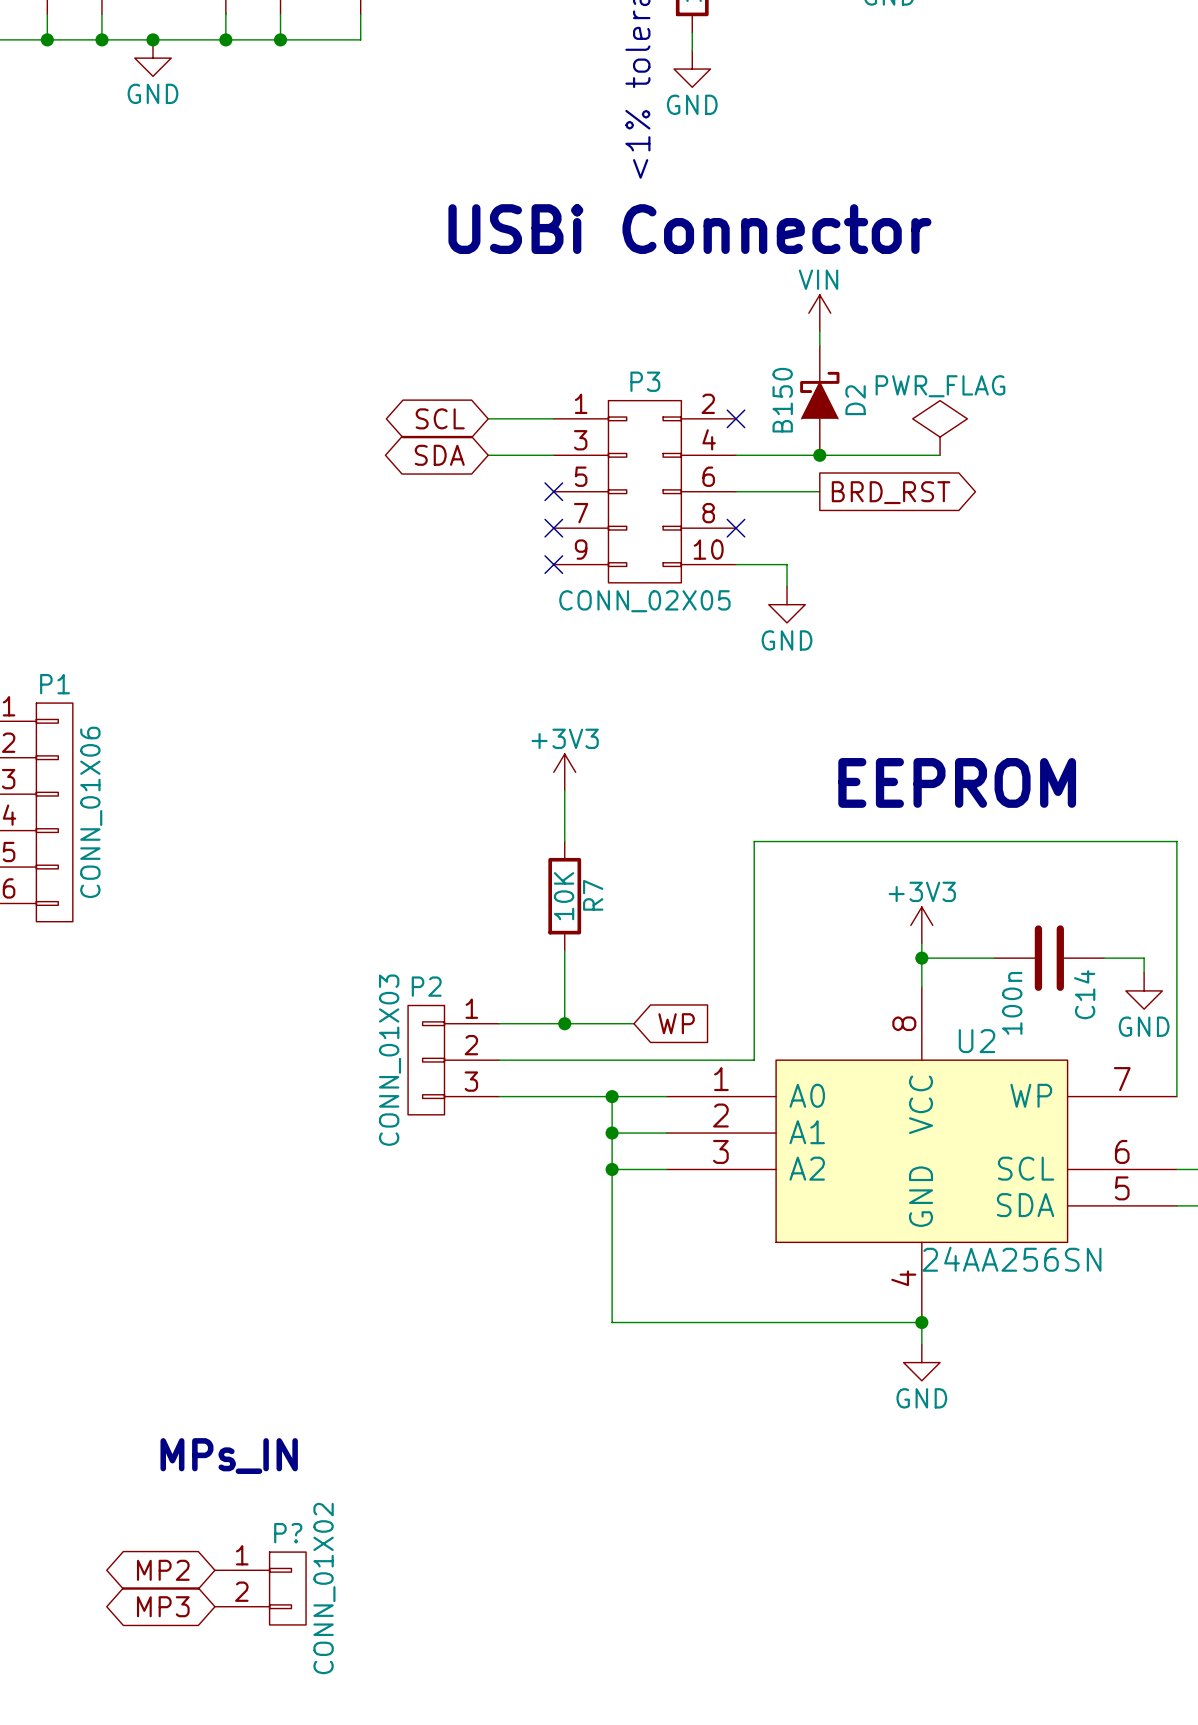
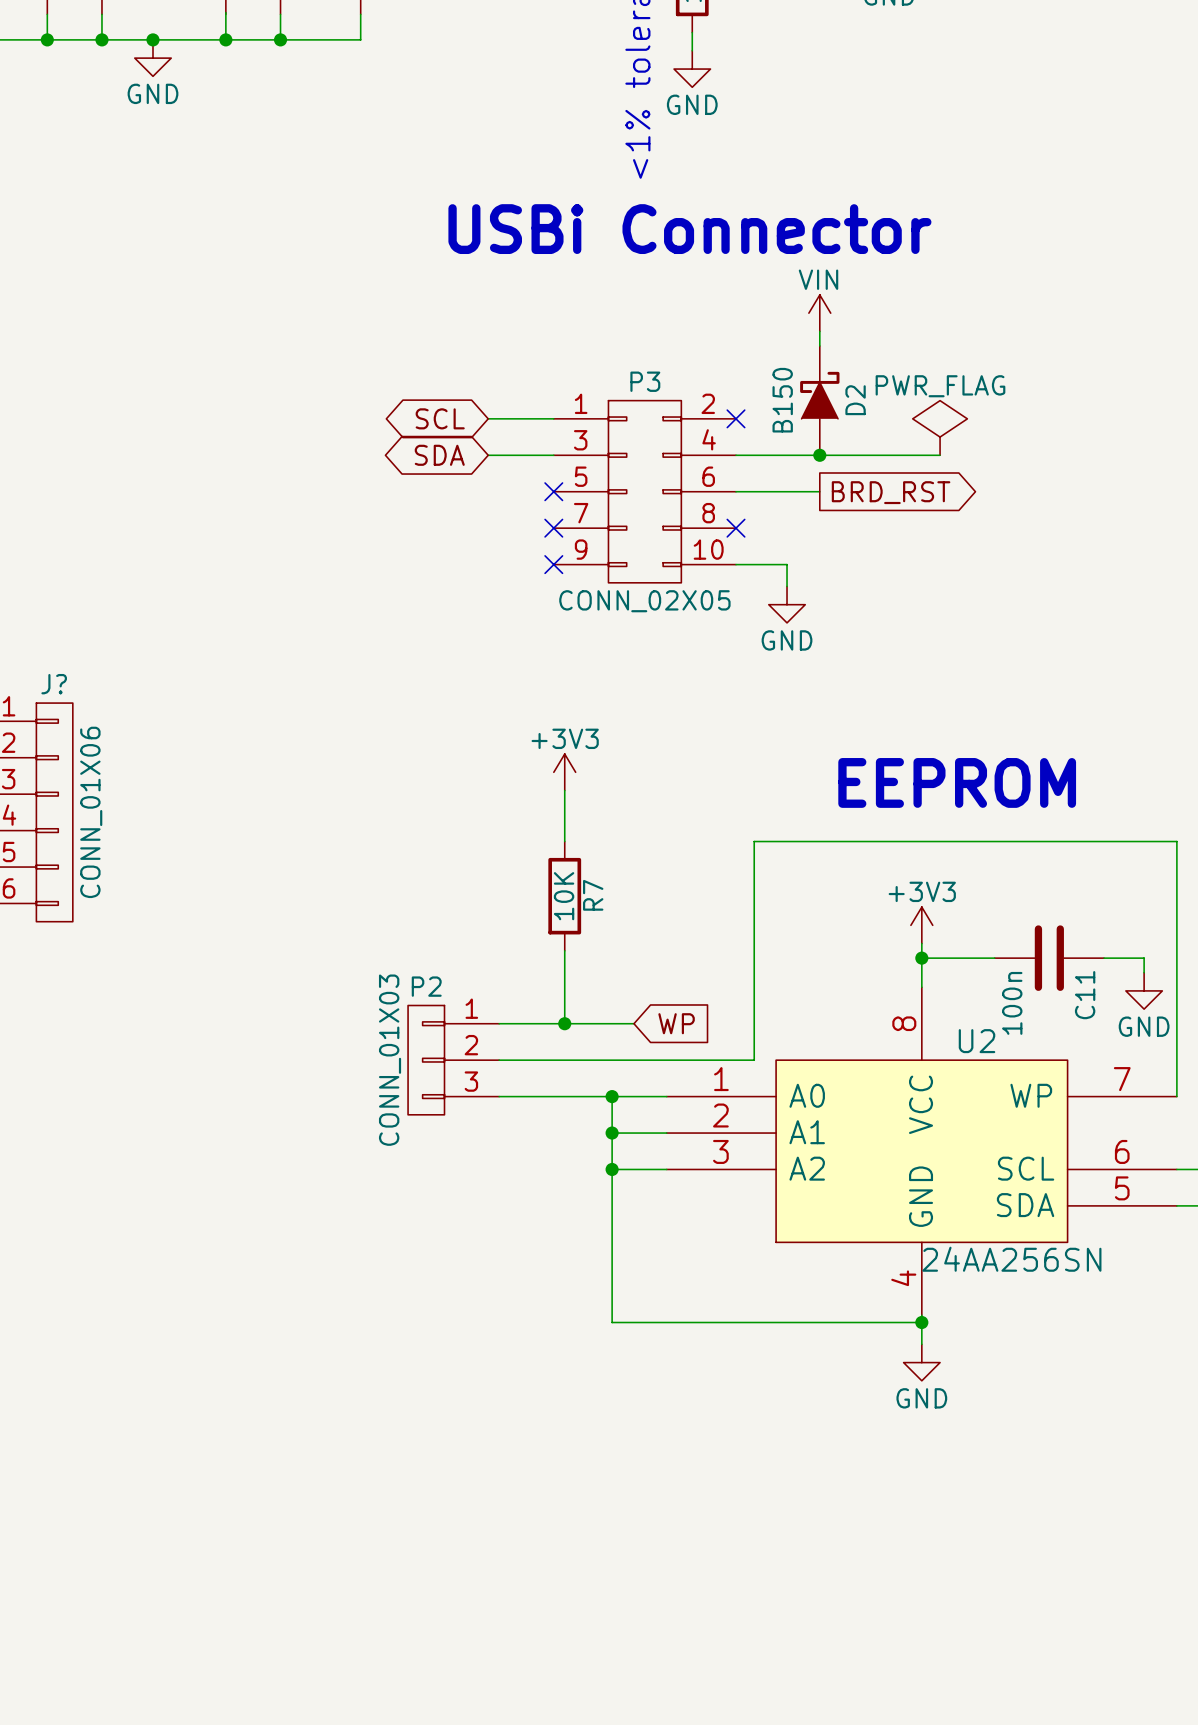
P1 name: P1 (55, 684) -> J? (54, 684)
C14 name: C14 (1084, 994) -> C11 (1085, 995)
text: MPs_IN (229, 1456) -> none
global label: MP2 (163, 1570) -> none
P?: CONN_01X02 (260, 1588) -> none
global label: MP3 (163, 1606) -> none

